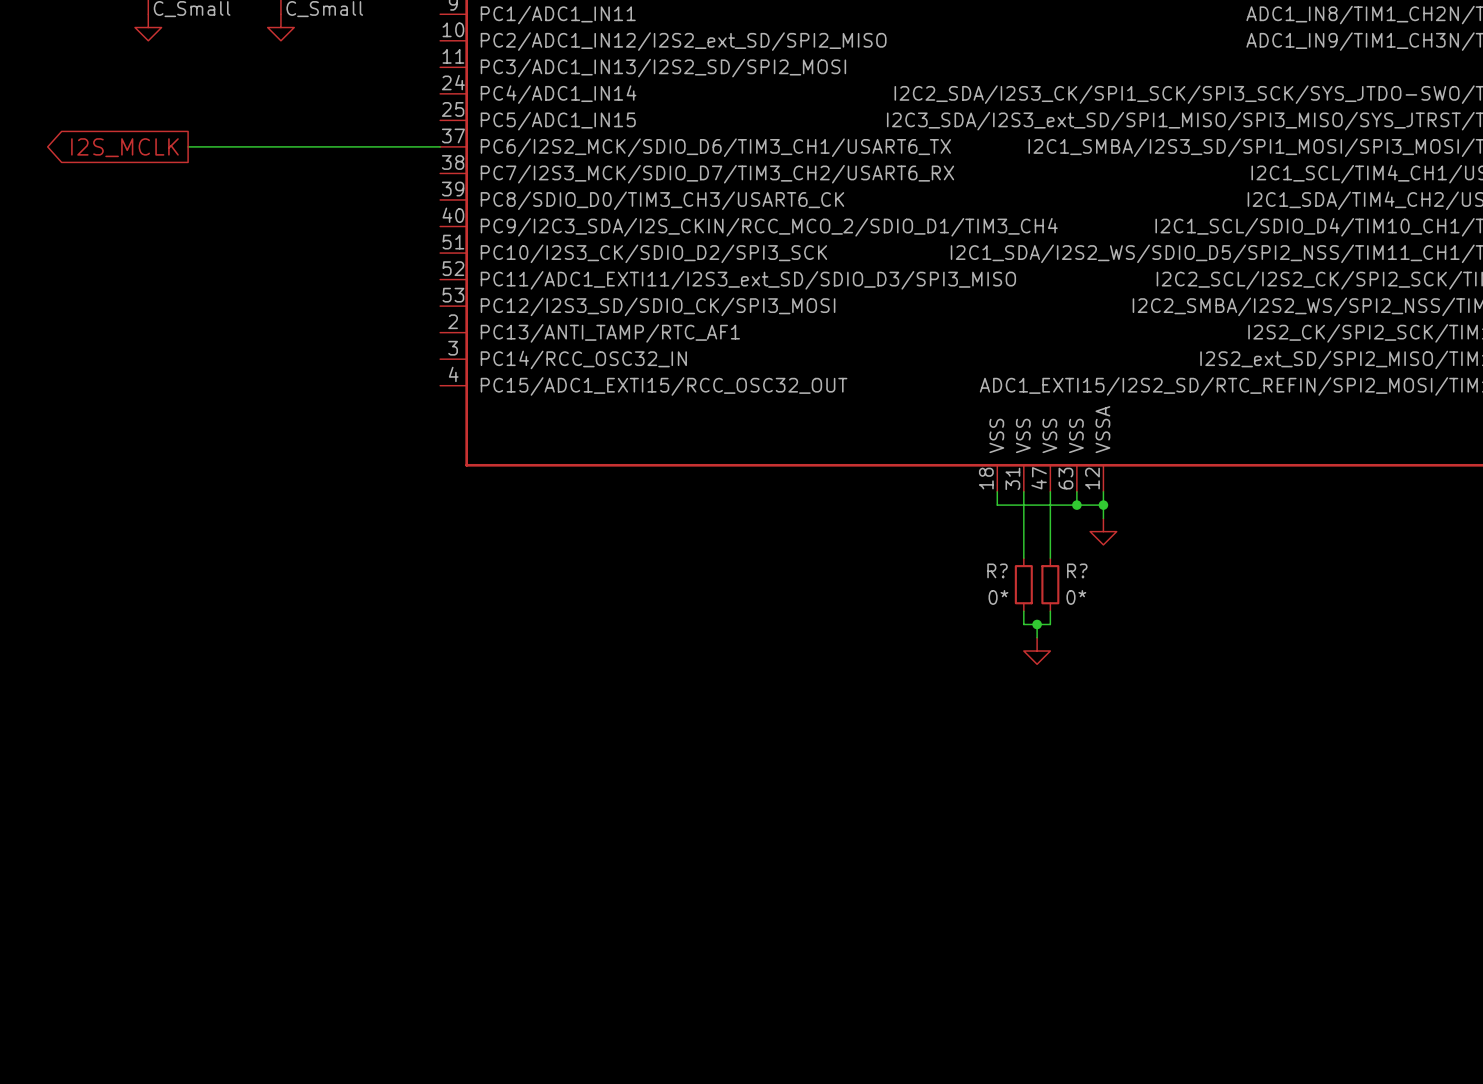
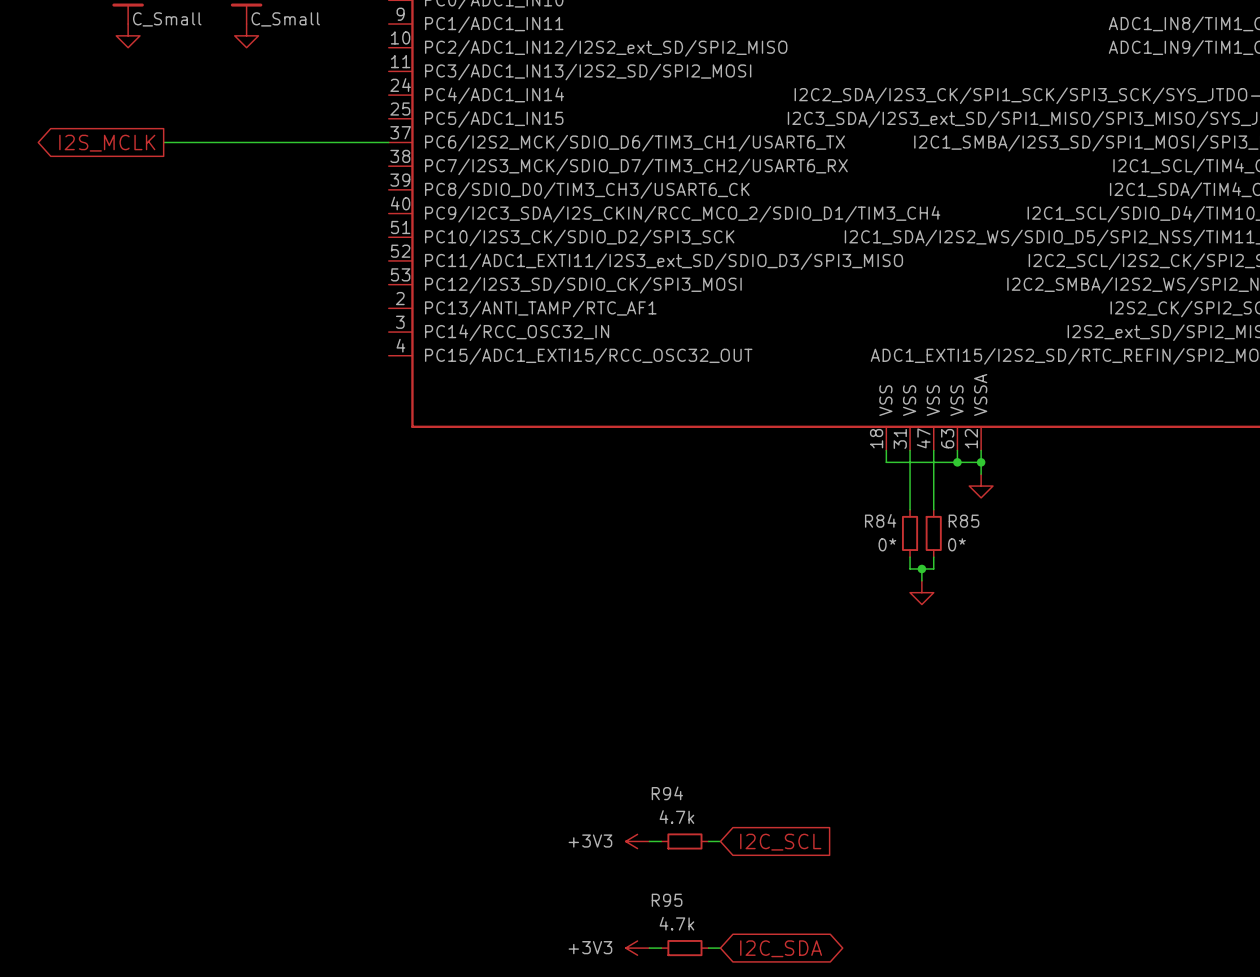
R? name: R? (997, 570) -> R84 (880, 520)
R? name: R? (1077, 570) -> R85 (964, 521)
power symbol: none -> +3V3 (637, 841)
wire: none -> (649, 841) (661, 841)
R94: none -> 4.7k (684, 841)
wire: none -> (708, 841) (720, 841)
global label: none -> I2C_SCL (780, 842)
power symbol: none -> +3V3 (637, 948)
wire: none -> (649, 948) (661, 948)
R95: none -> 4.7k (684, 948)
wire: none -> (708, 948) (720, 948)
global label: none -> I2C_SDA (781, 948)

